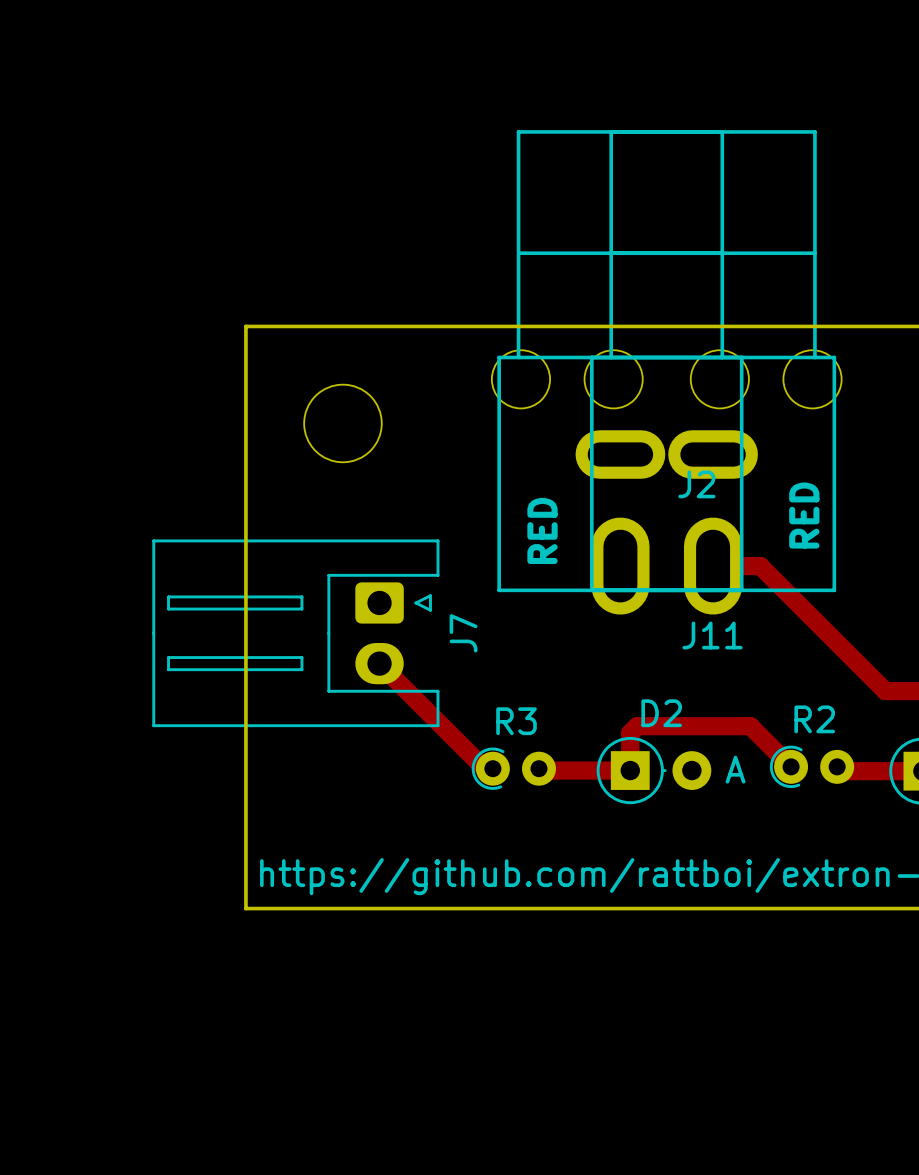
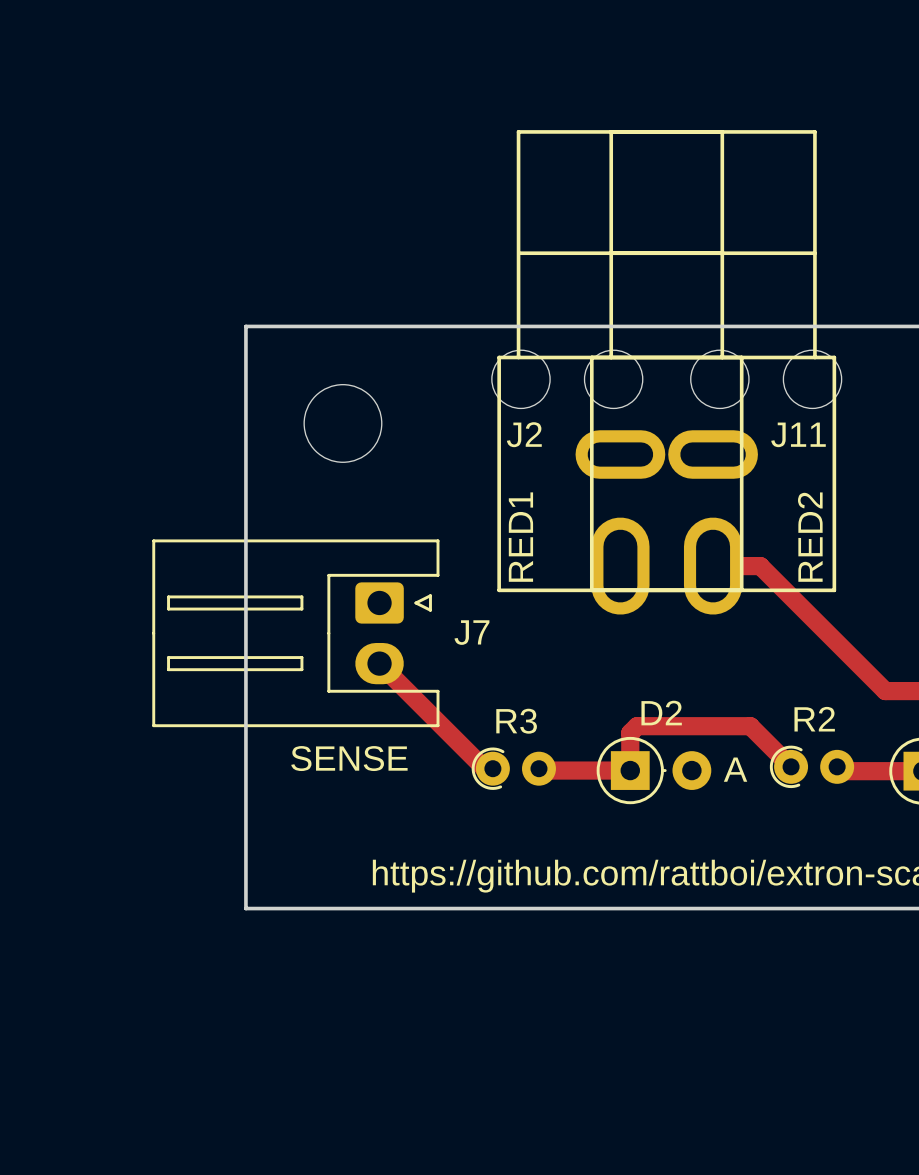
J2 name position: J2 (696, 484) -> J2 (524, 434)
J11 value: RED (804, 515) -> RED2 (810, 537)
J2 value: RED (542, 530) -> RED1 (520, 537)
J7 name rotation: 0° (463, 633) -> 90° clockwise (471, 632)
J11 name position: J11 (712, 635) -> J11 (798, 434)
J7 value: none -> SENSE (349, 758)

